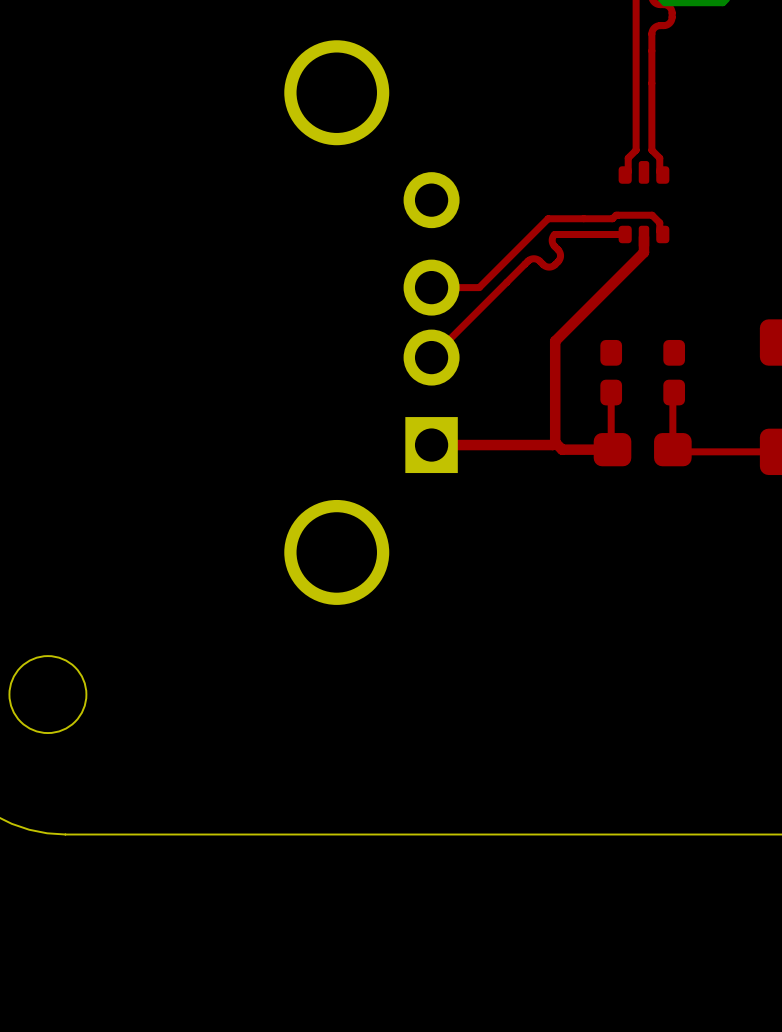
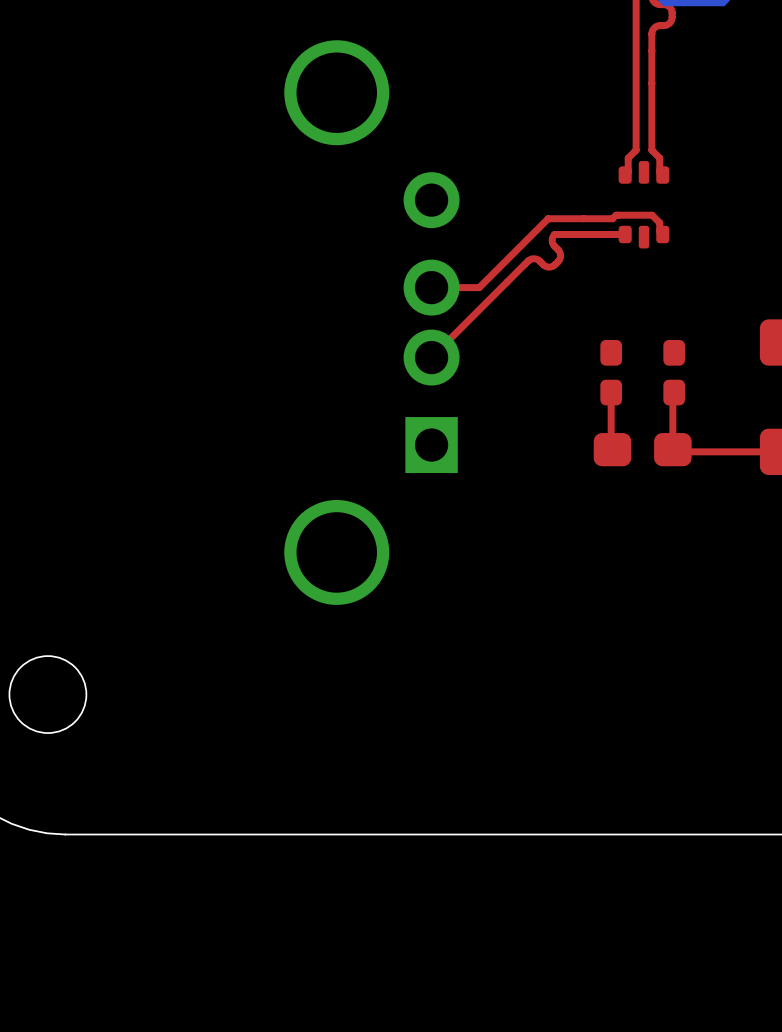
top track: (643, 237) (643, 252) (555, 341) (555, 442) -> none
top track: (555, 442) (562, 449) (612, 449) -> none
top track: (555, 442) (552, 445) (431, 445) -> none

